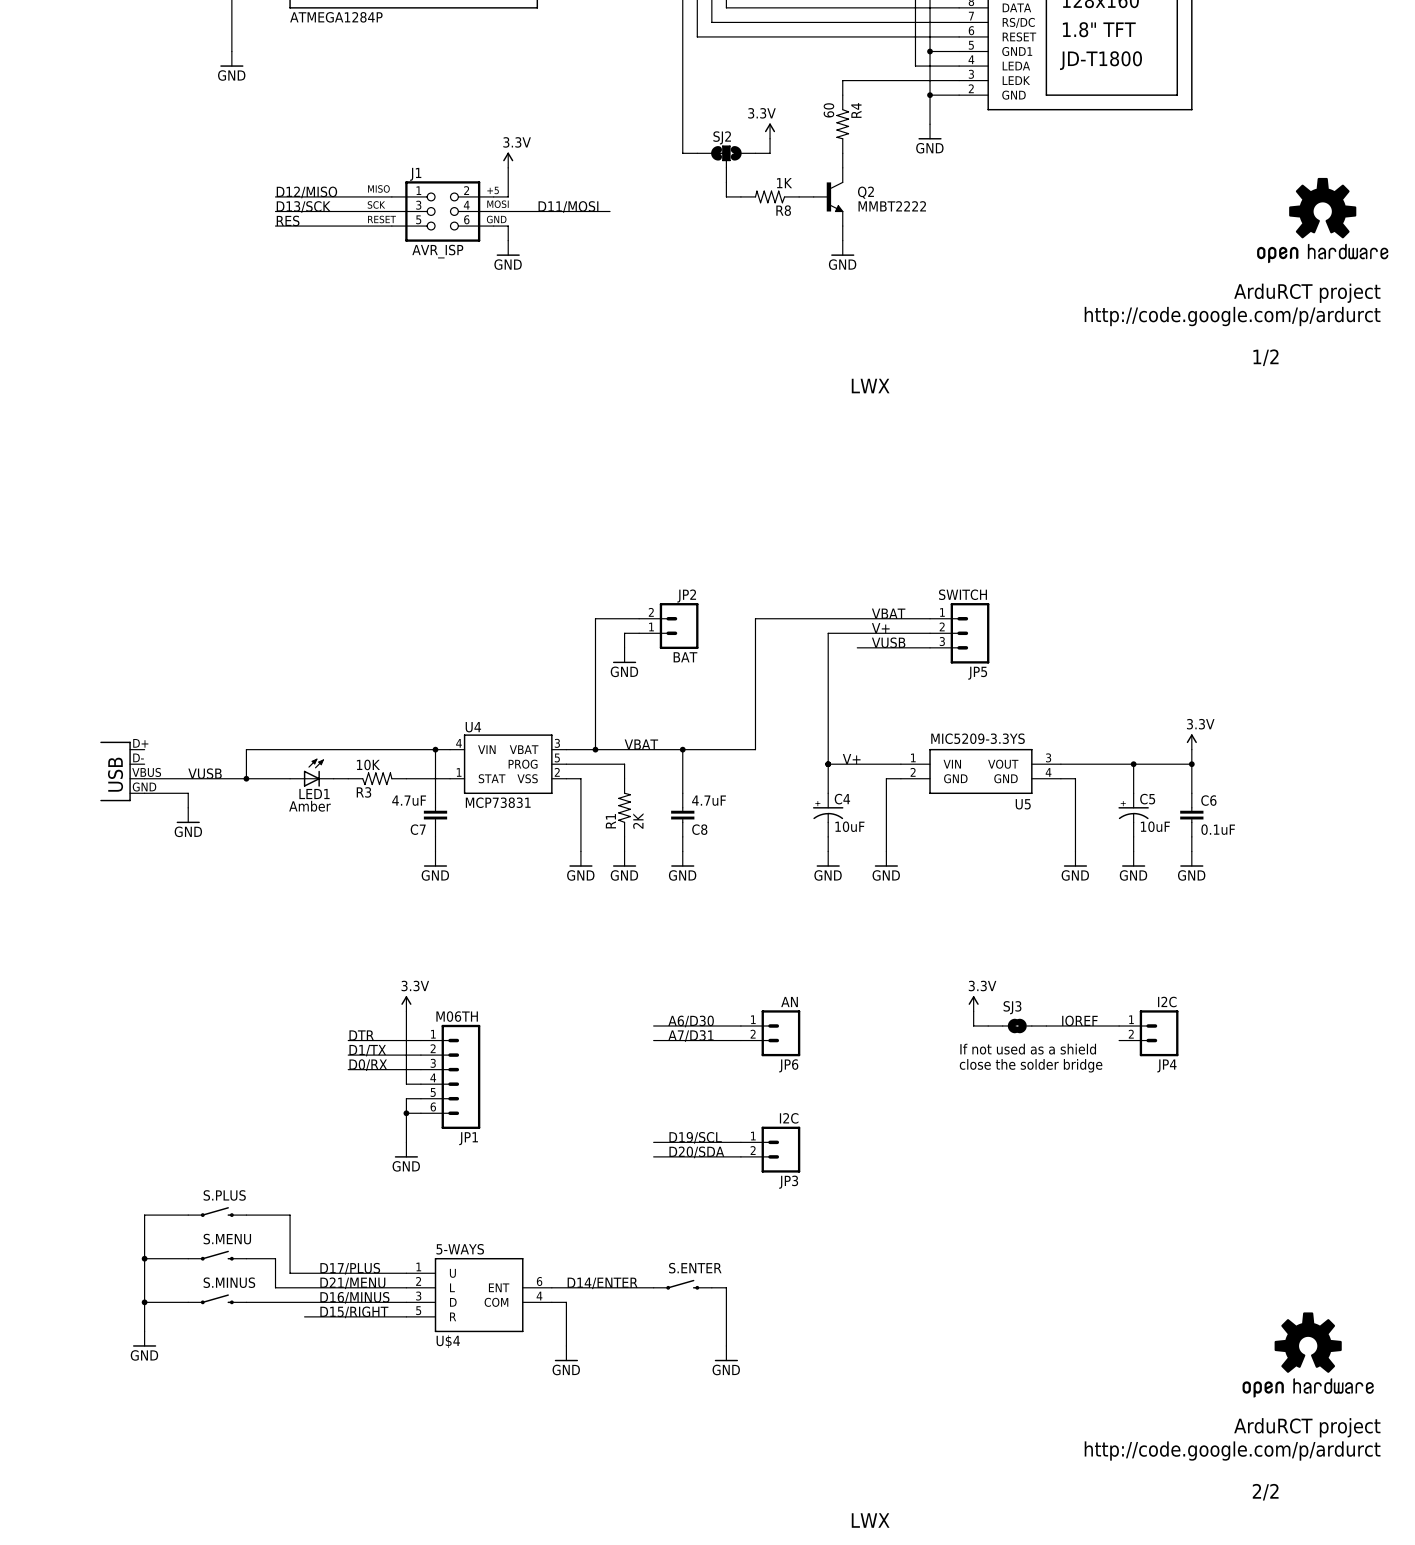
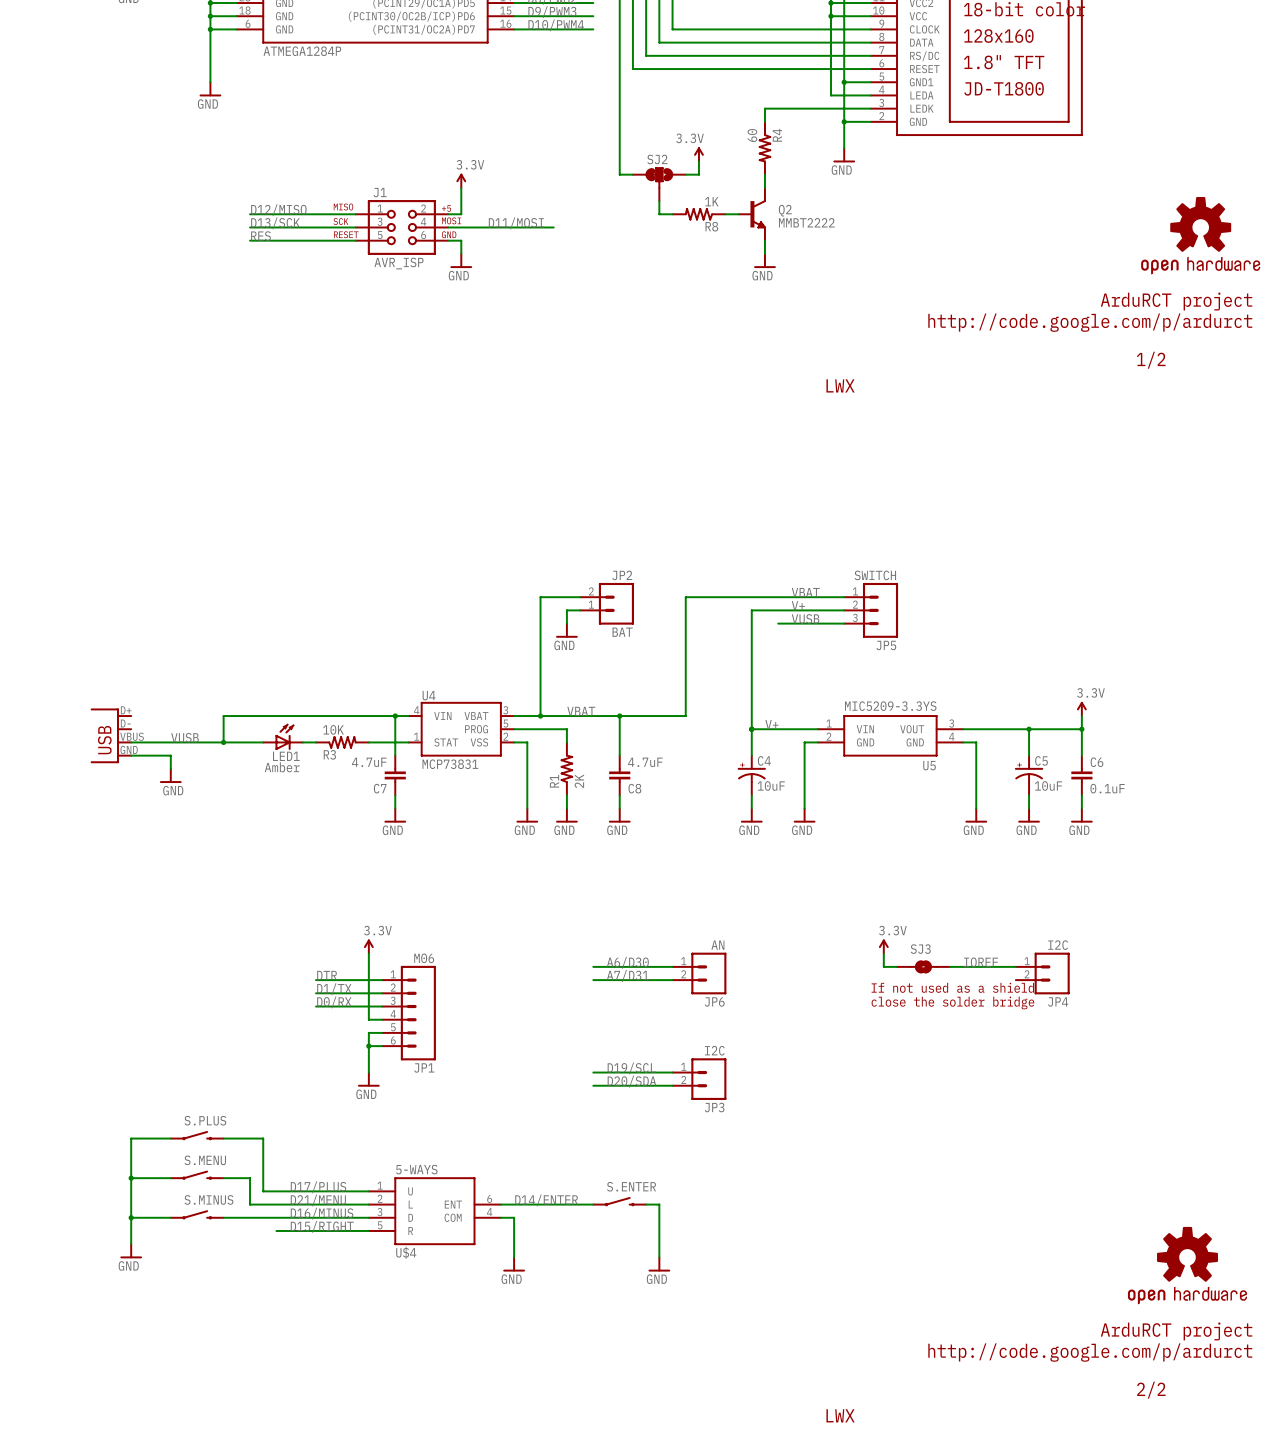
text position: LWX (870, 386) -> LWX (840, 385)
JP1 value: M06TH (457, 1016) -> M06 (424, 958)
text position: LWX (870, 1520) -> LWX (840, 1415)

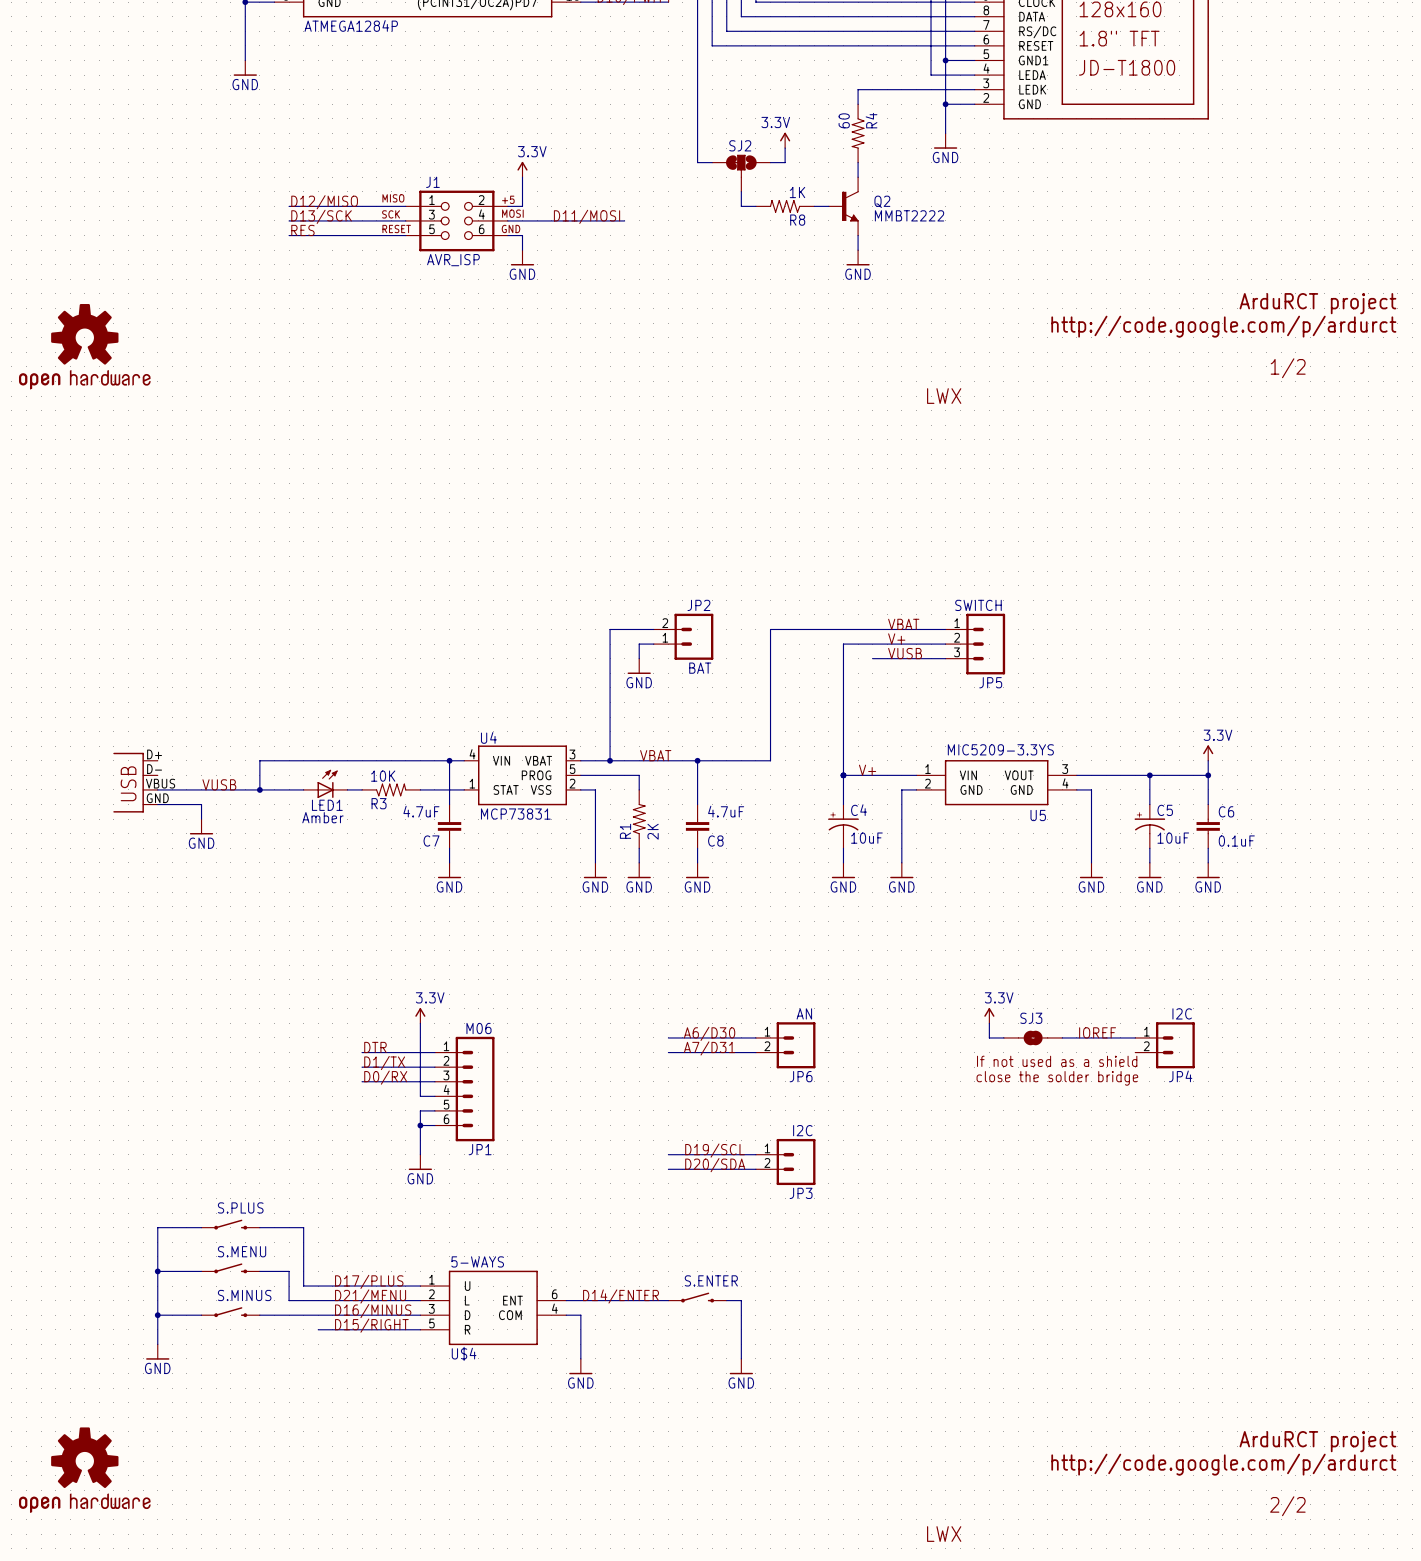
part: (1200, 235) -> none
part: none -> (84, 346)
part: (1187, 1265) -> none
part: none -> (84, 1470)

